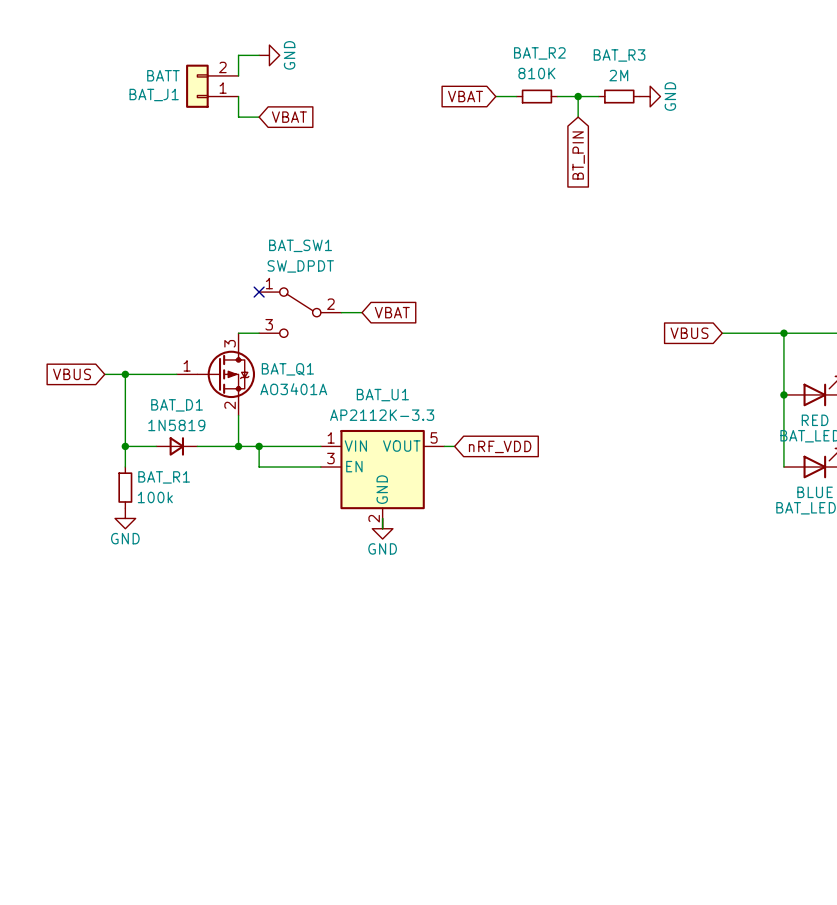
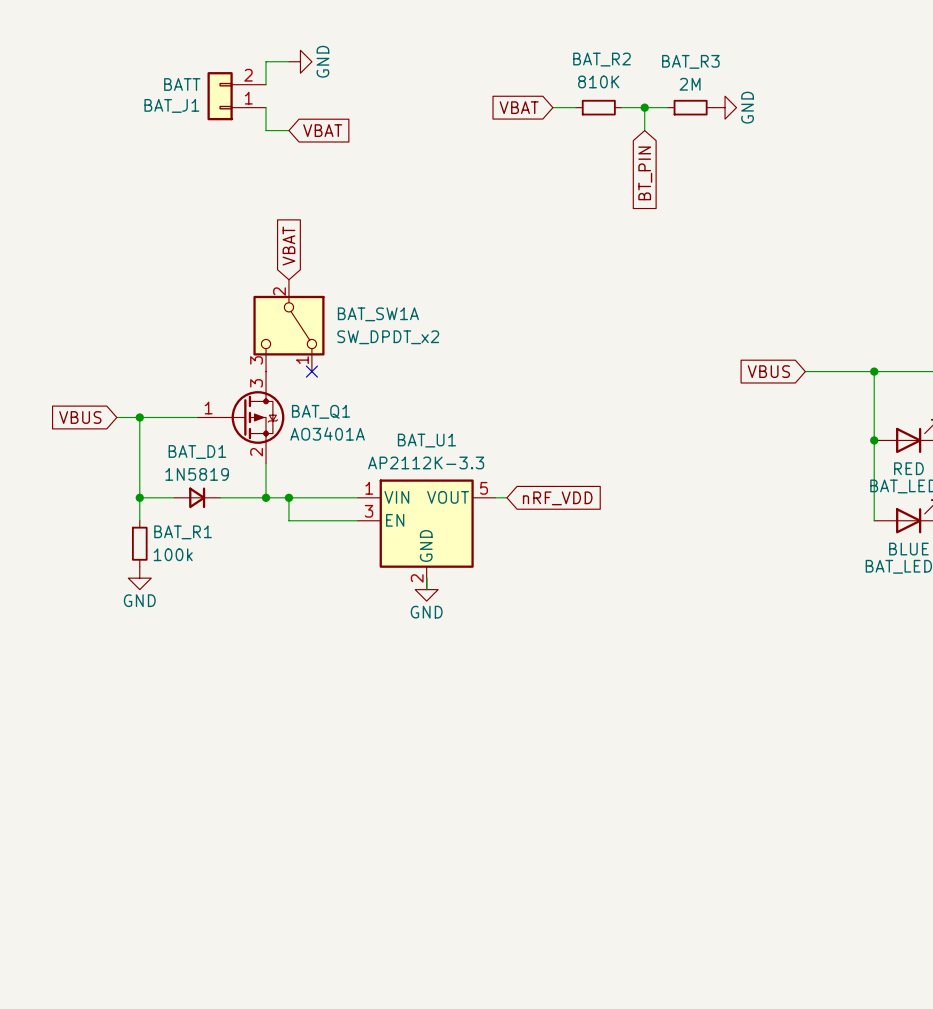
no-connect mark position: (259, 292) -> (311, 371)
BAT_SW1A: none -> SW_DPDT_x2 (288, 325)
BAT_SW1: SW_DPDT (300, 312) -> none
wire: (341, 312) (362, 312) -> none
global label rotation: 0° (392, 312) -> 90° counterclockwise (288, 246)
global label position: VBAT (392, 312) -> VBAT (288, 246)
wire: (238, 333) (259, 333) -> none

